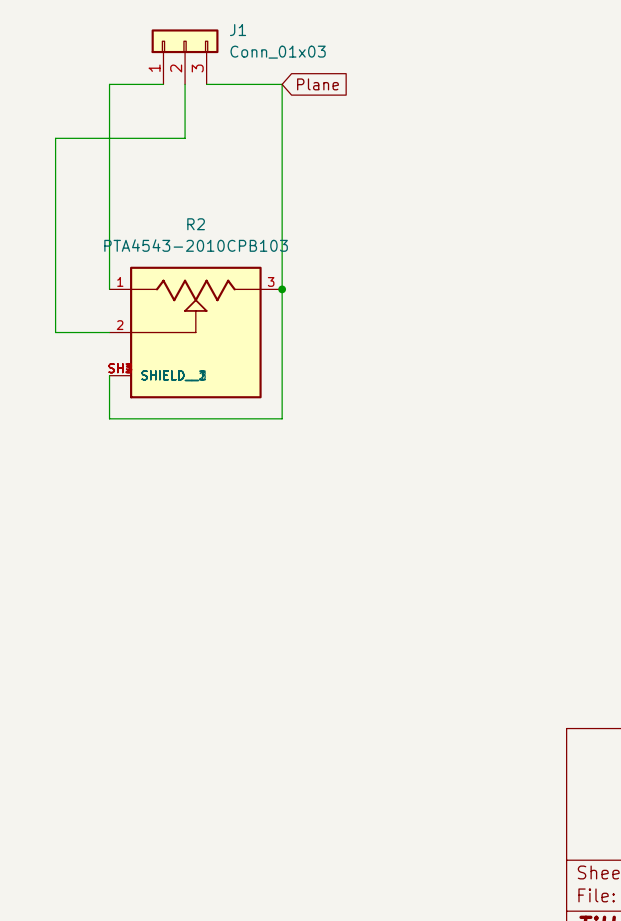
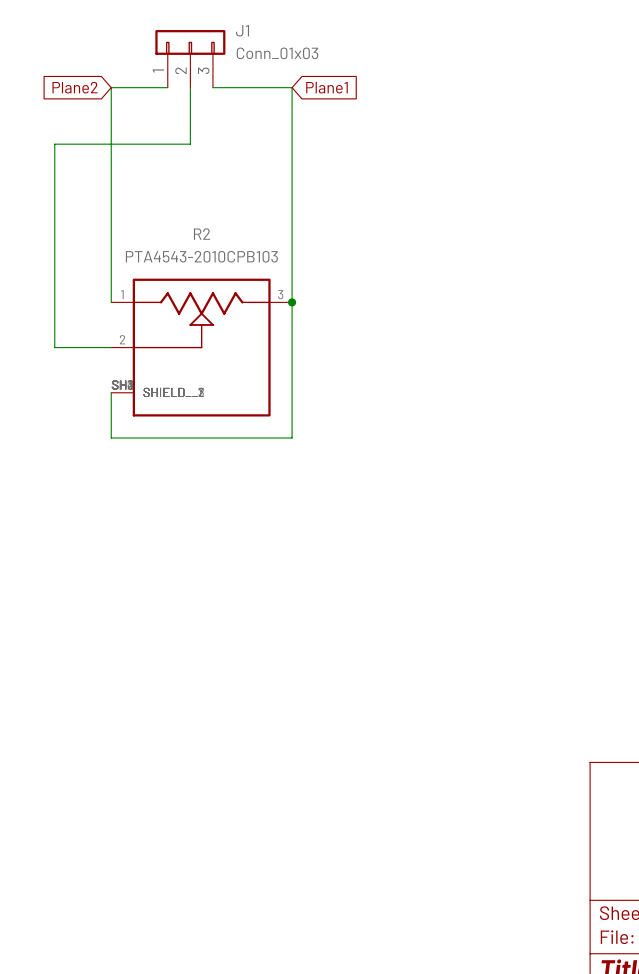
global label: none -> Plane2 (75, 87)
global label: Plane (317, 84) -> Plane1 (326, 87)

